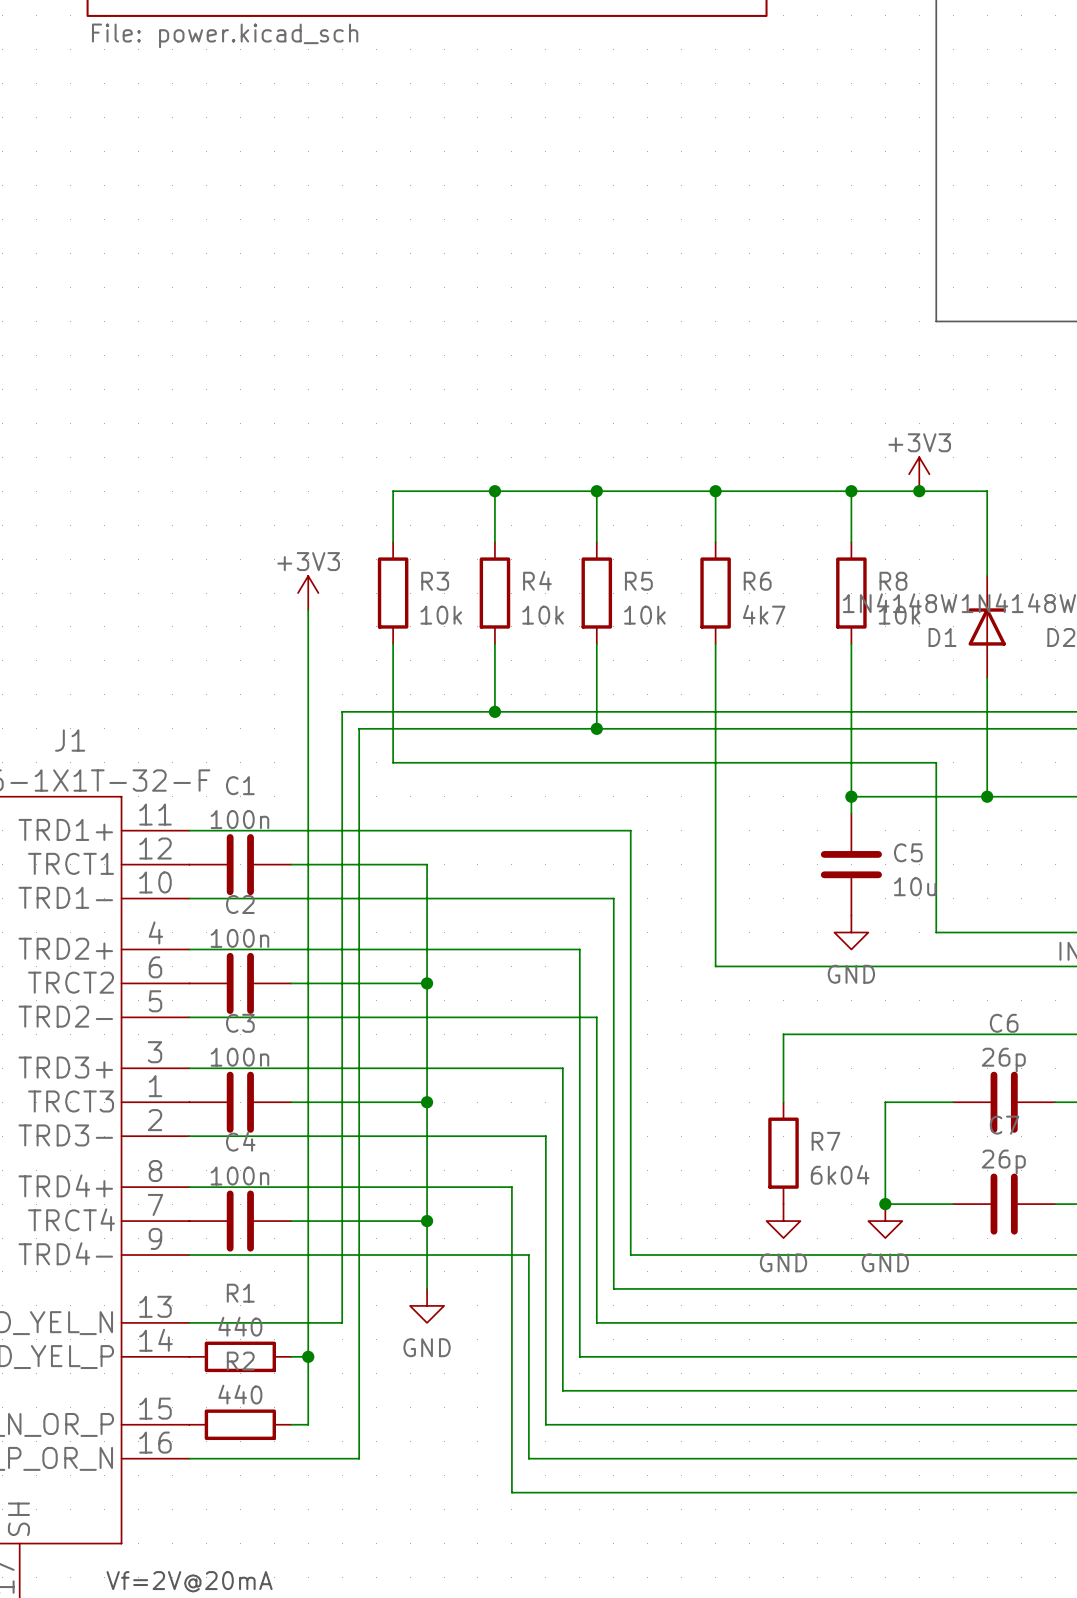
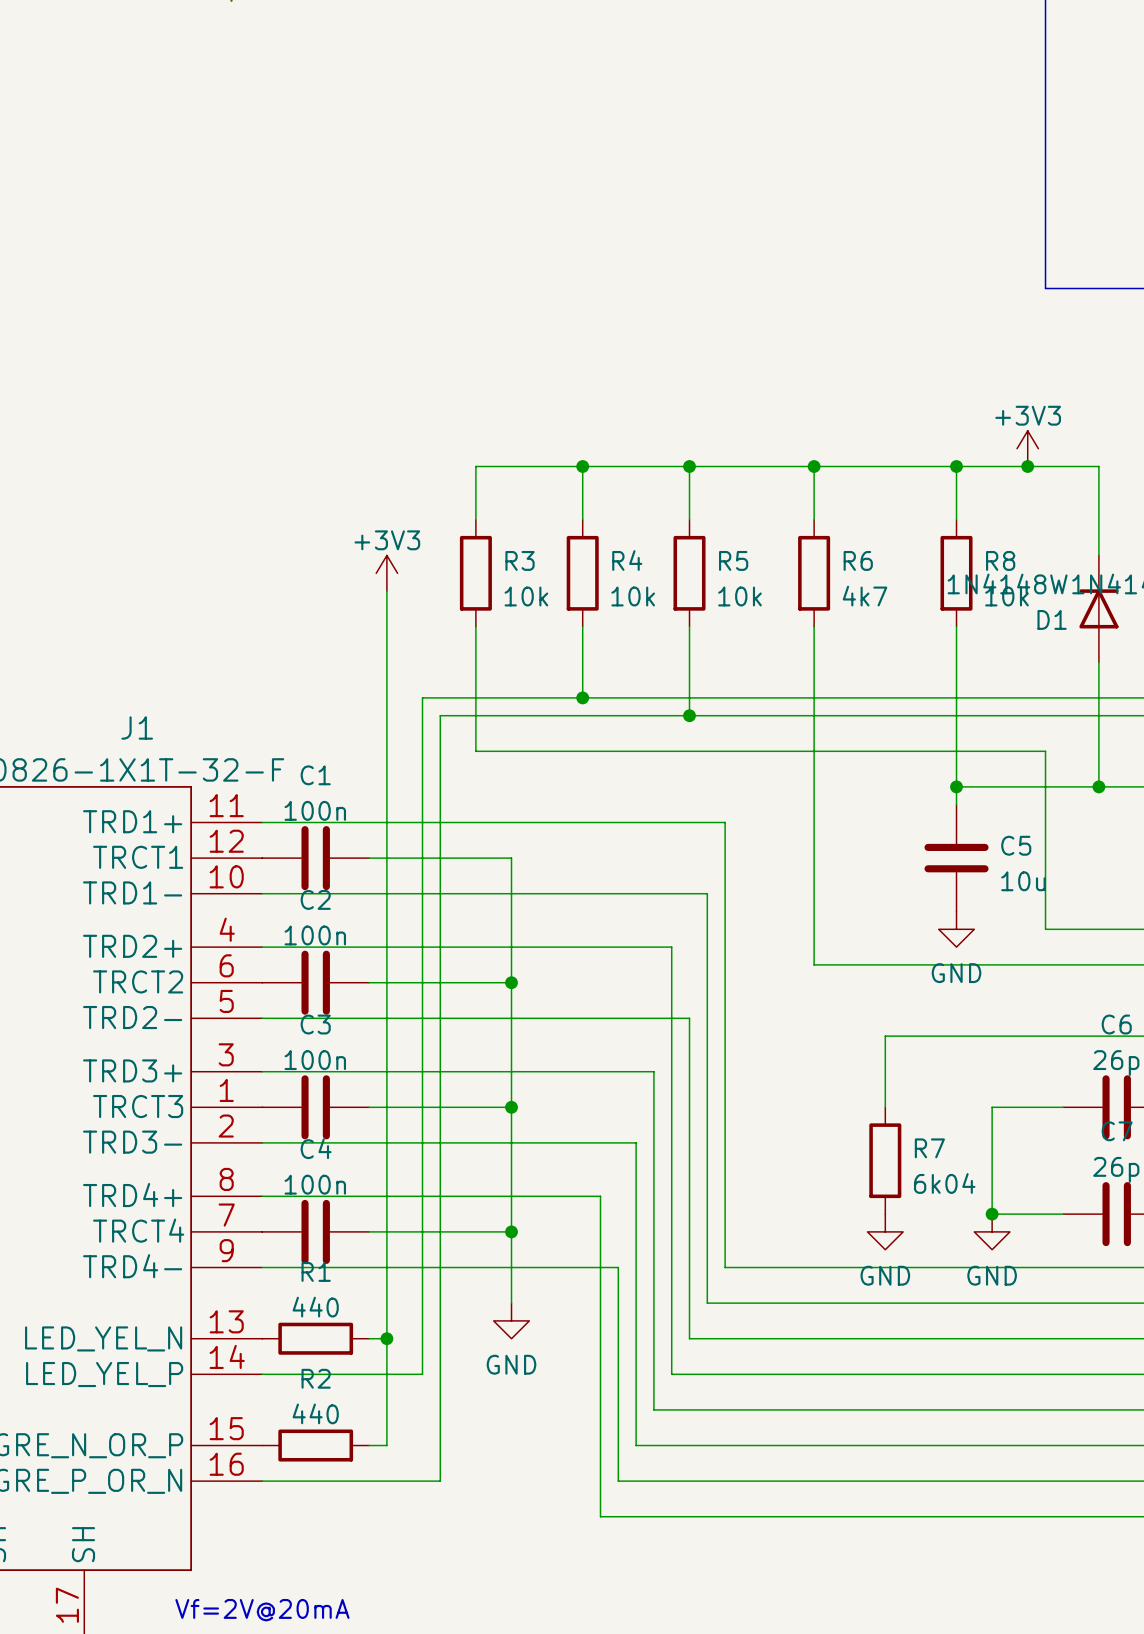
wire: (189, 1322) (291, 1322) -> (262, 1374) (369, 1374)
wire: (308, 1322) (342, 1322) -> (386, 1374) (422, 1374) (422, 1338)
R1 position: (240, 1356) -> (315, 1338)
junction position: (308, 1356) -> (386, 1338)

